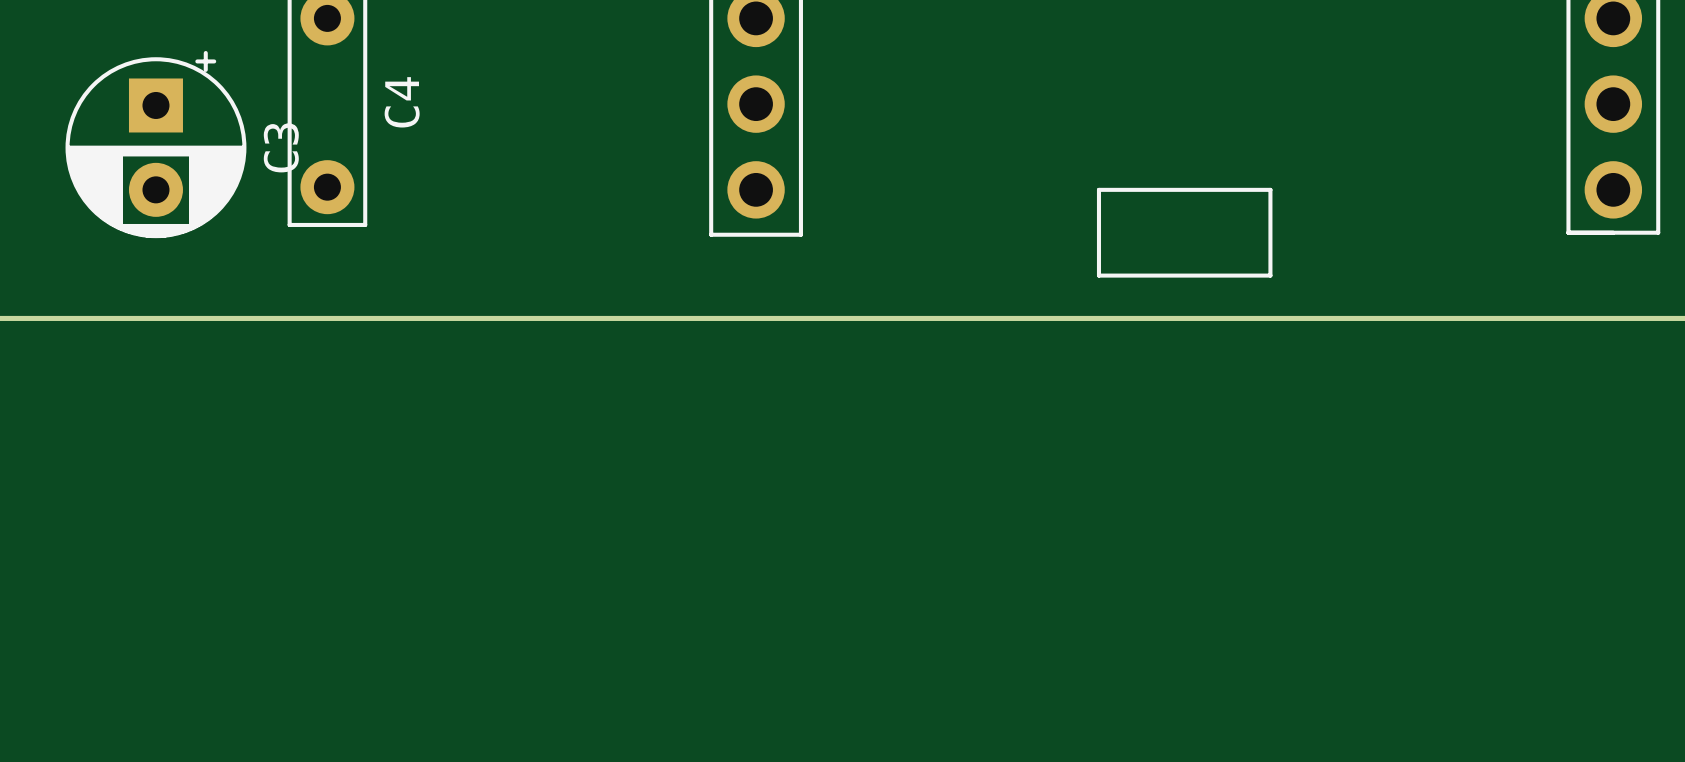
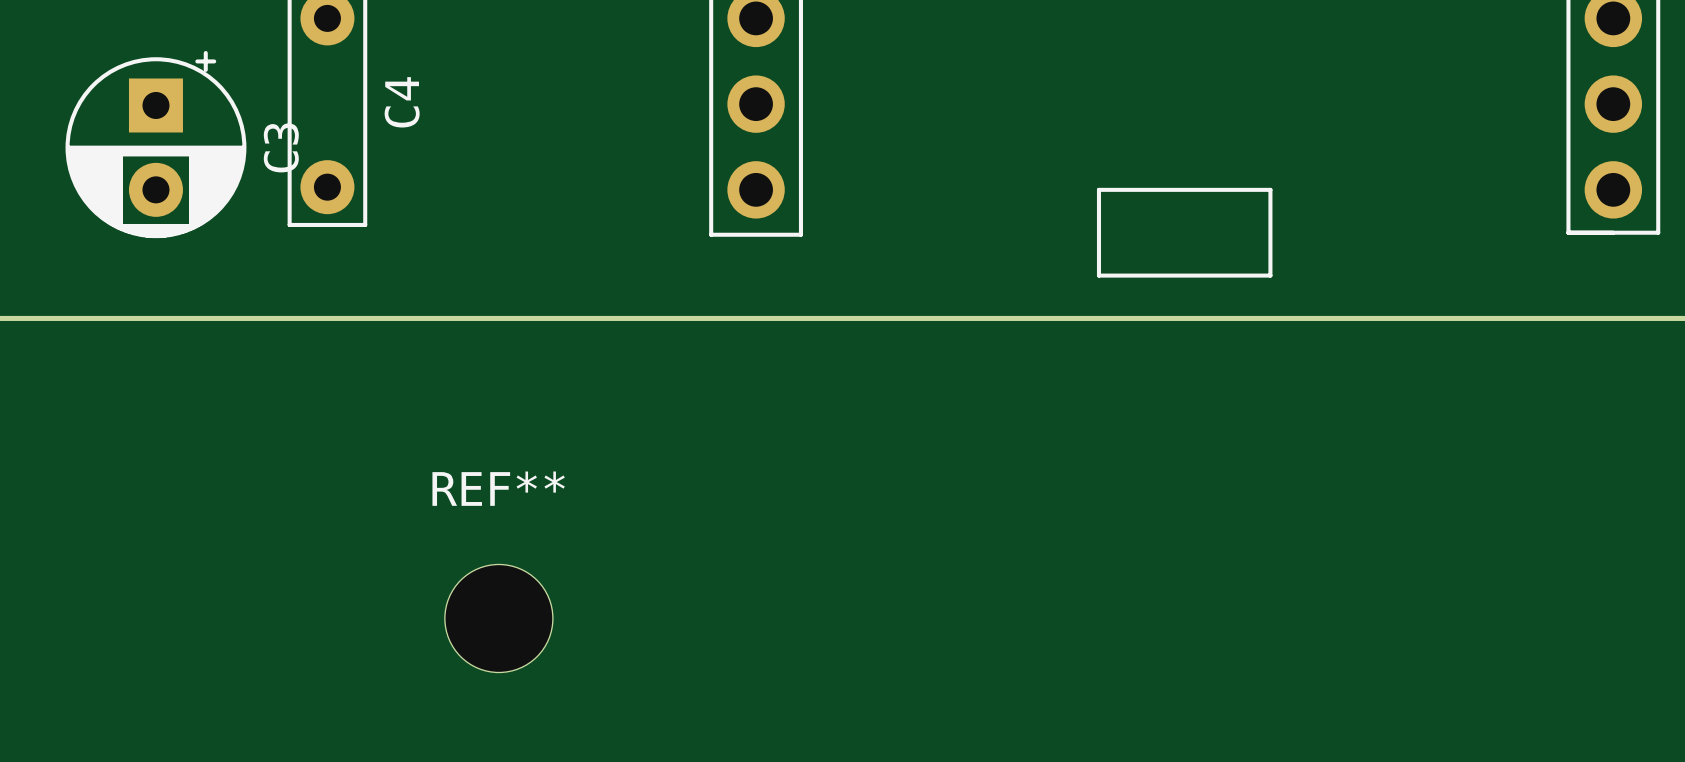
REF**: none -> (498, 618)

